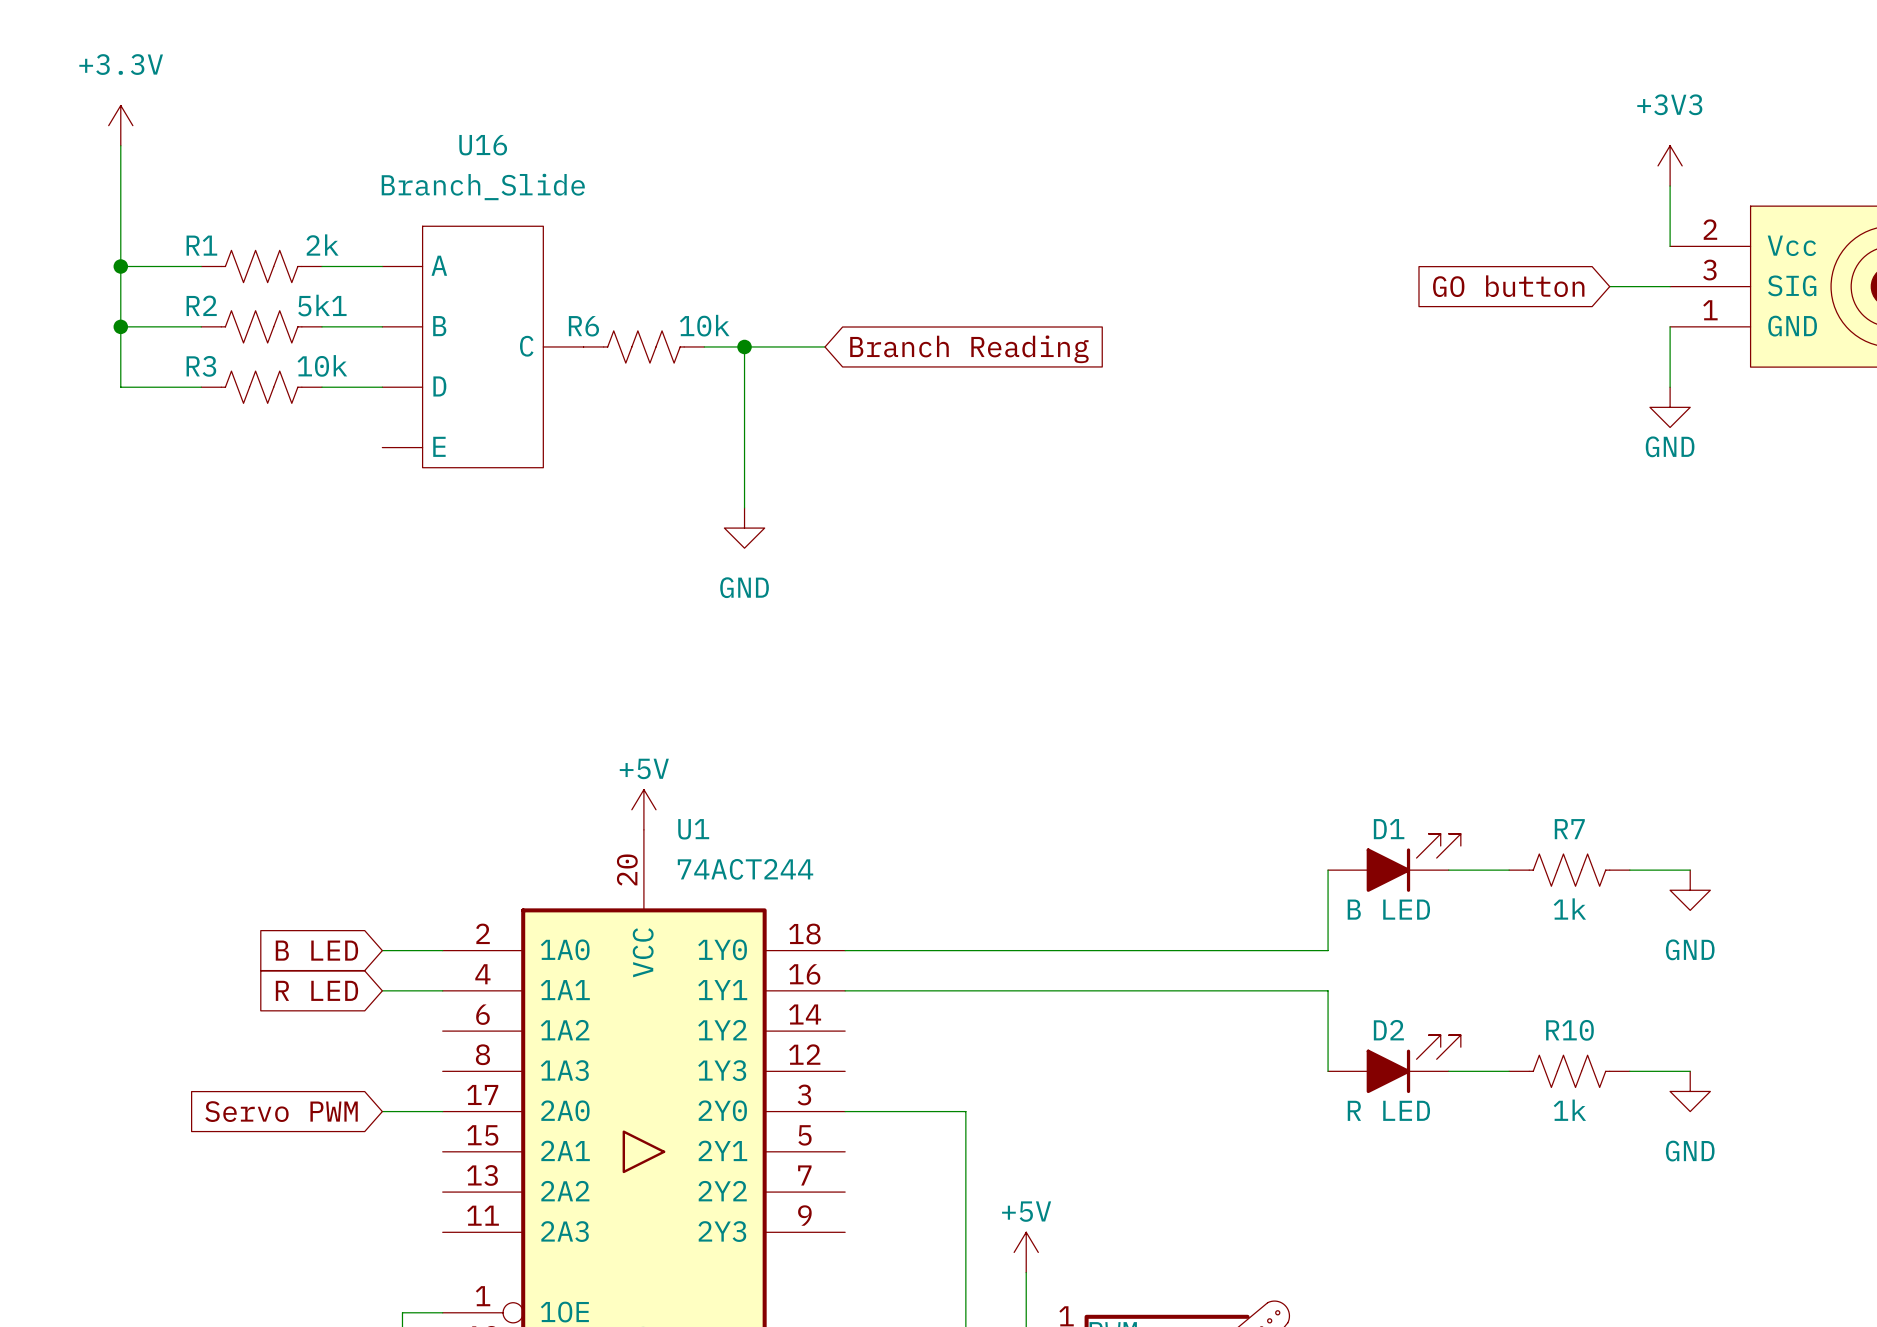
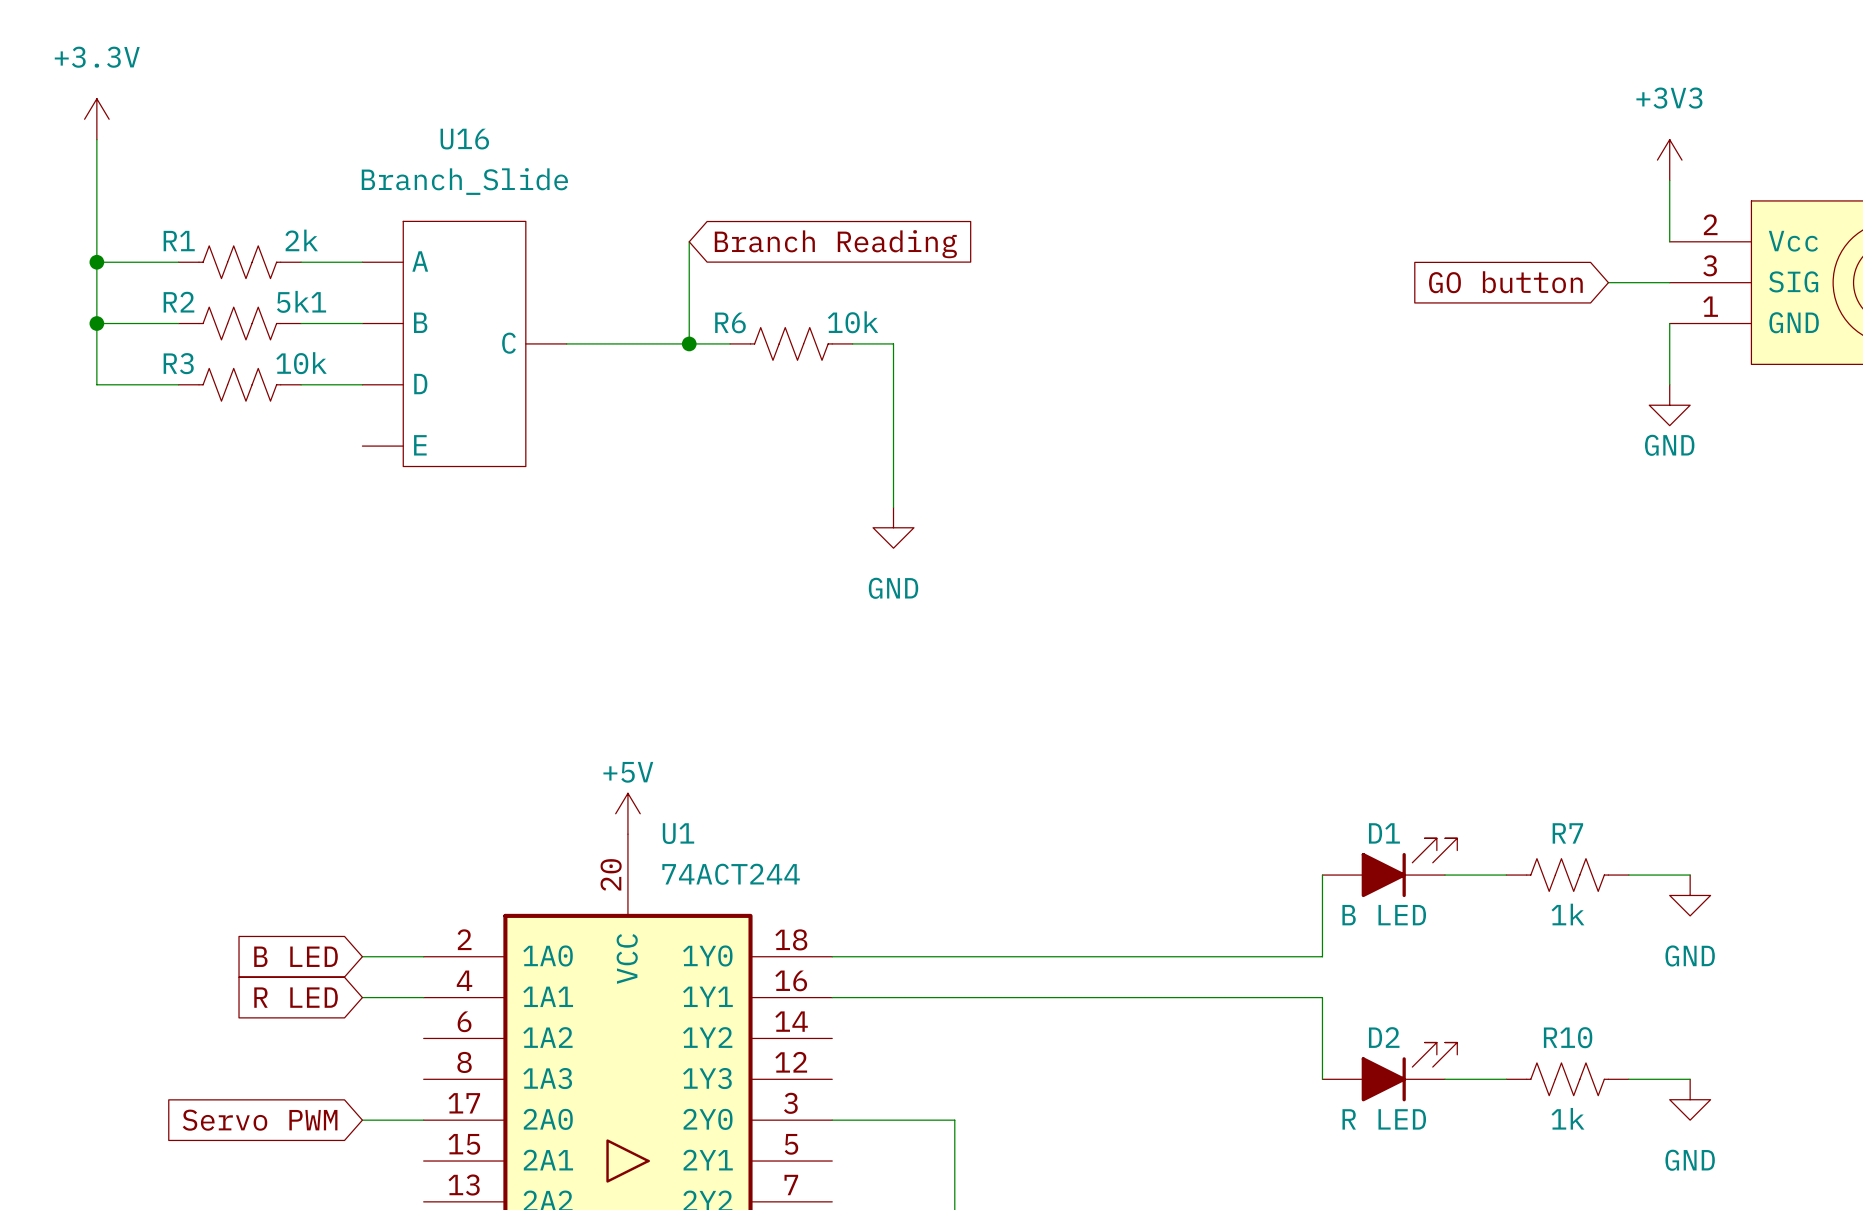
wire: none -> (689, 241) (689, 343) (566, 343)
R6 position: (643, 346) -> (791, 343)
junction position: (744, 346) -> (689, 343)
wire: (825, 346) (744, 346) (744, 507) -> none
wire: none -> (852, 343) (893, 343) (893, 507)
global label position: Branch Reading (969, 349) -> Branch Reading (835, 244)
power symbol position: GND (744, 528) -> GND (893, 527)

